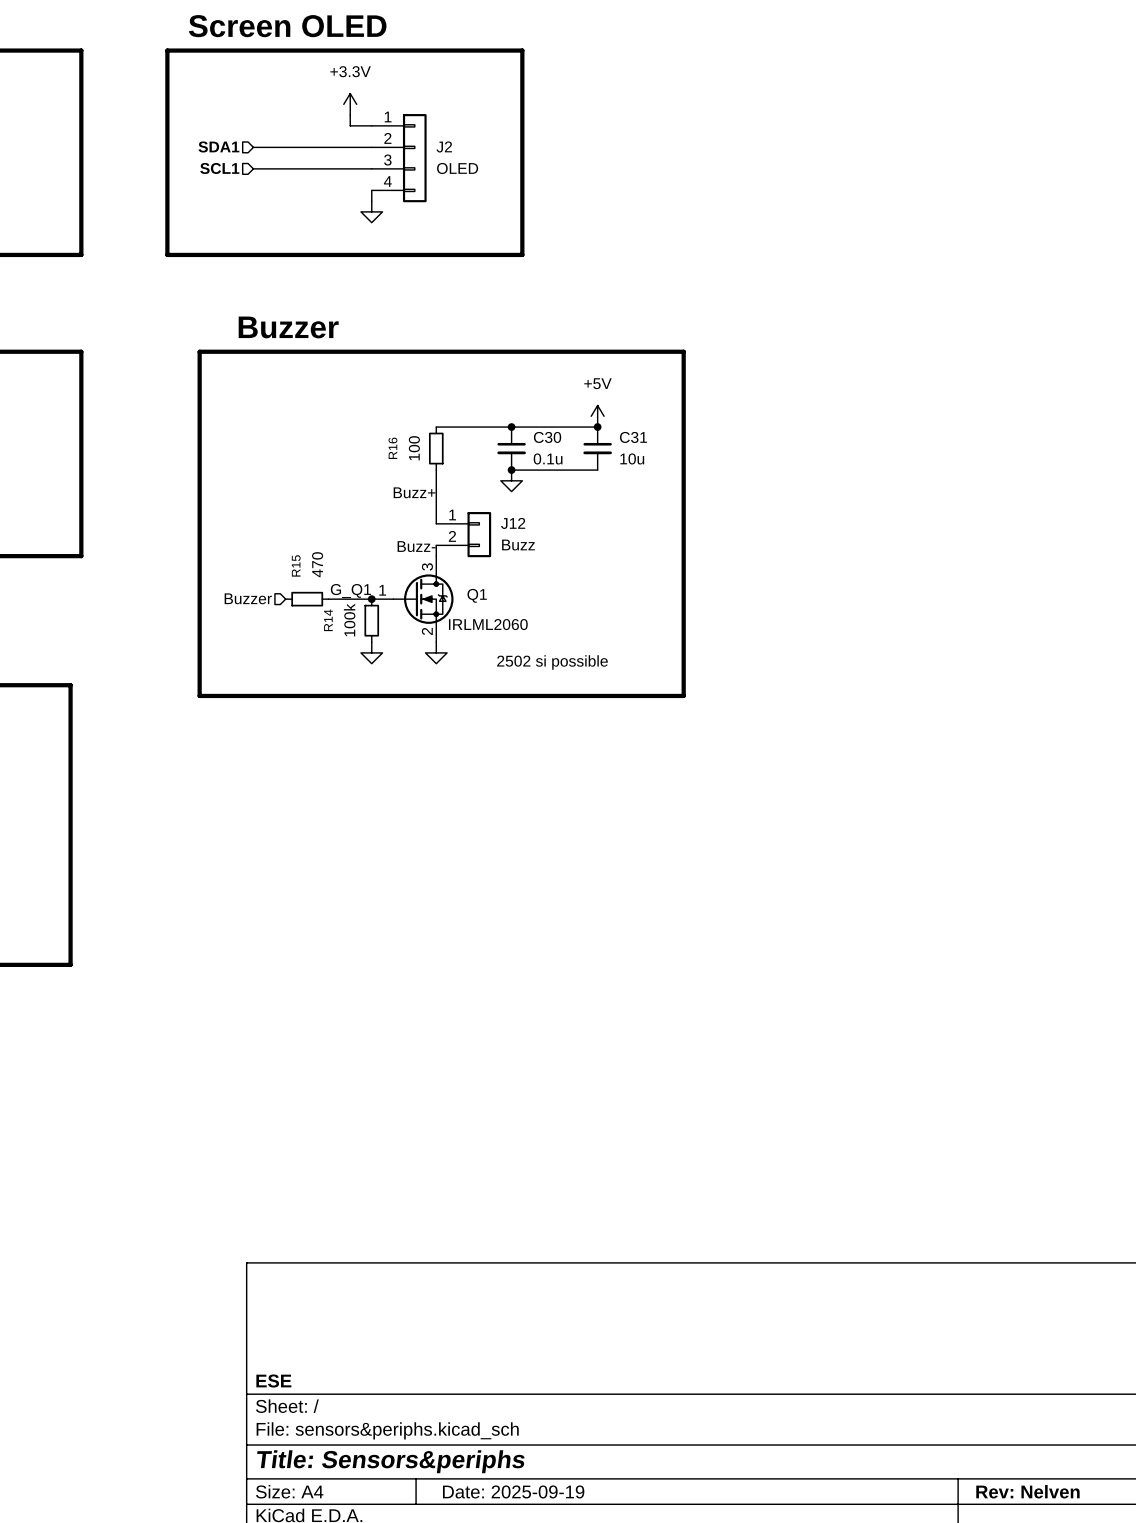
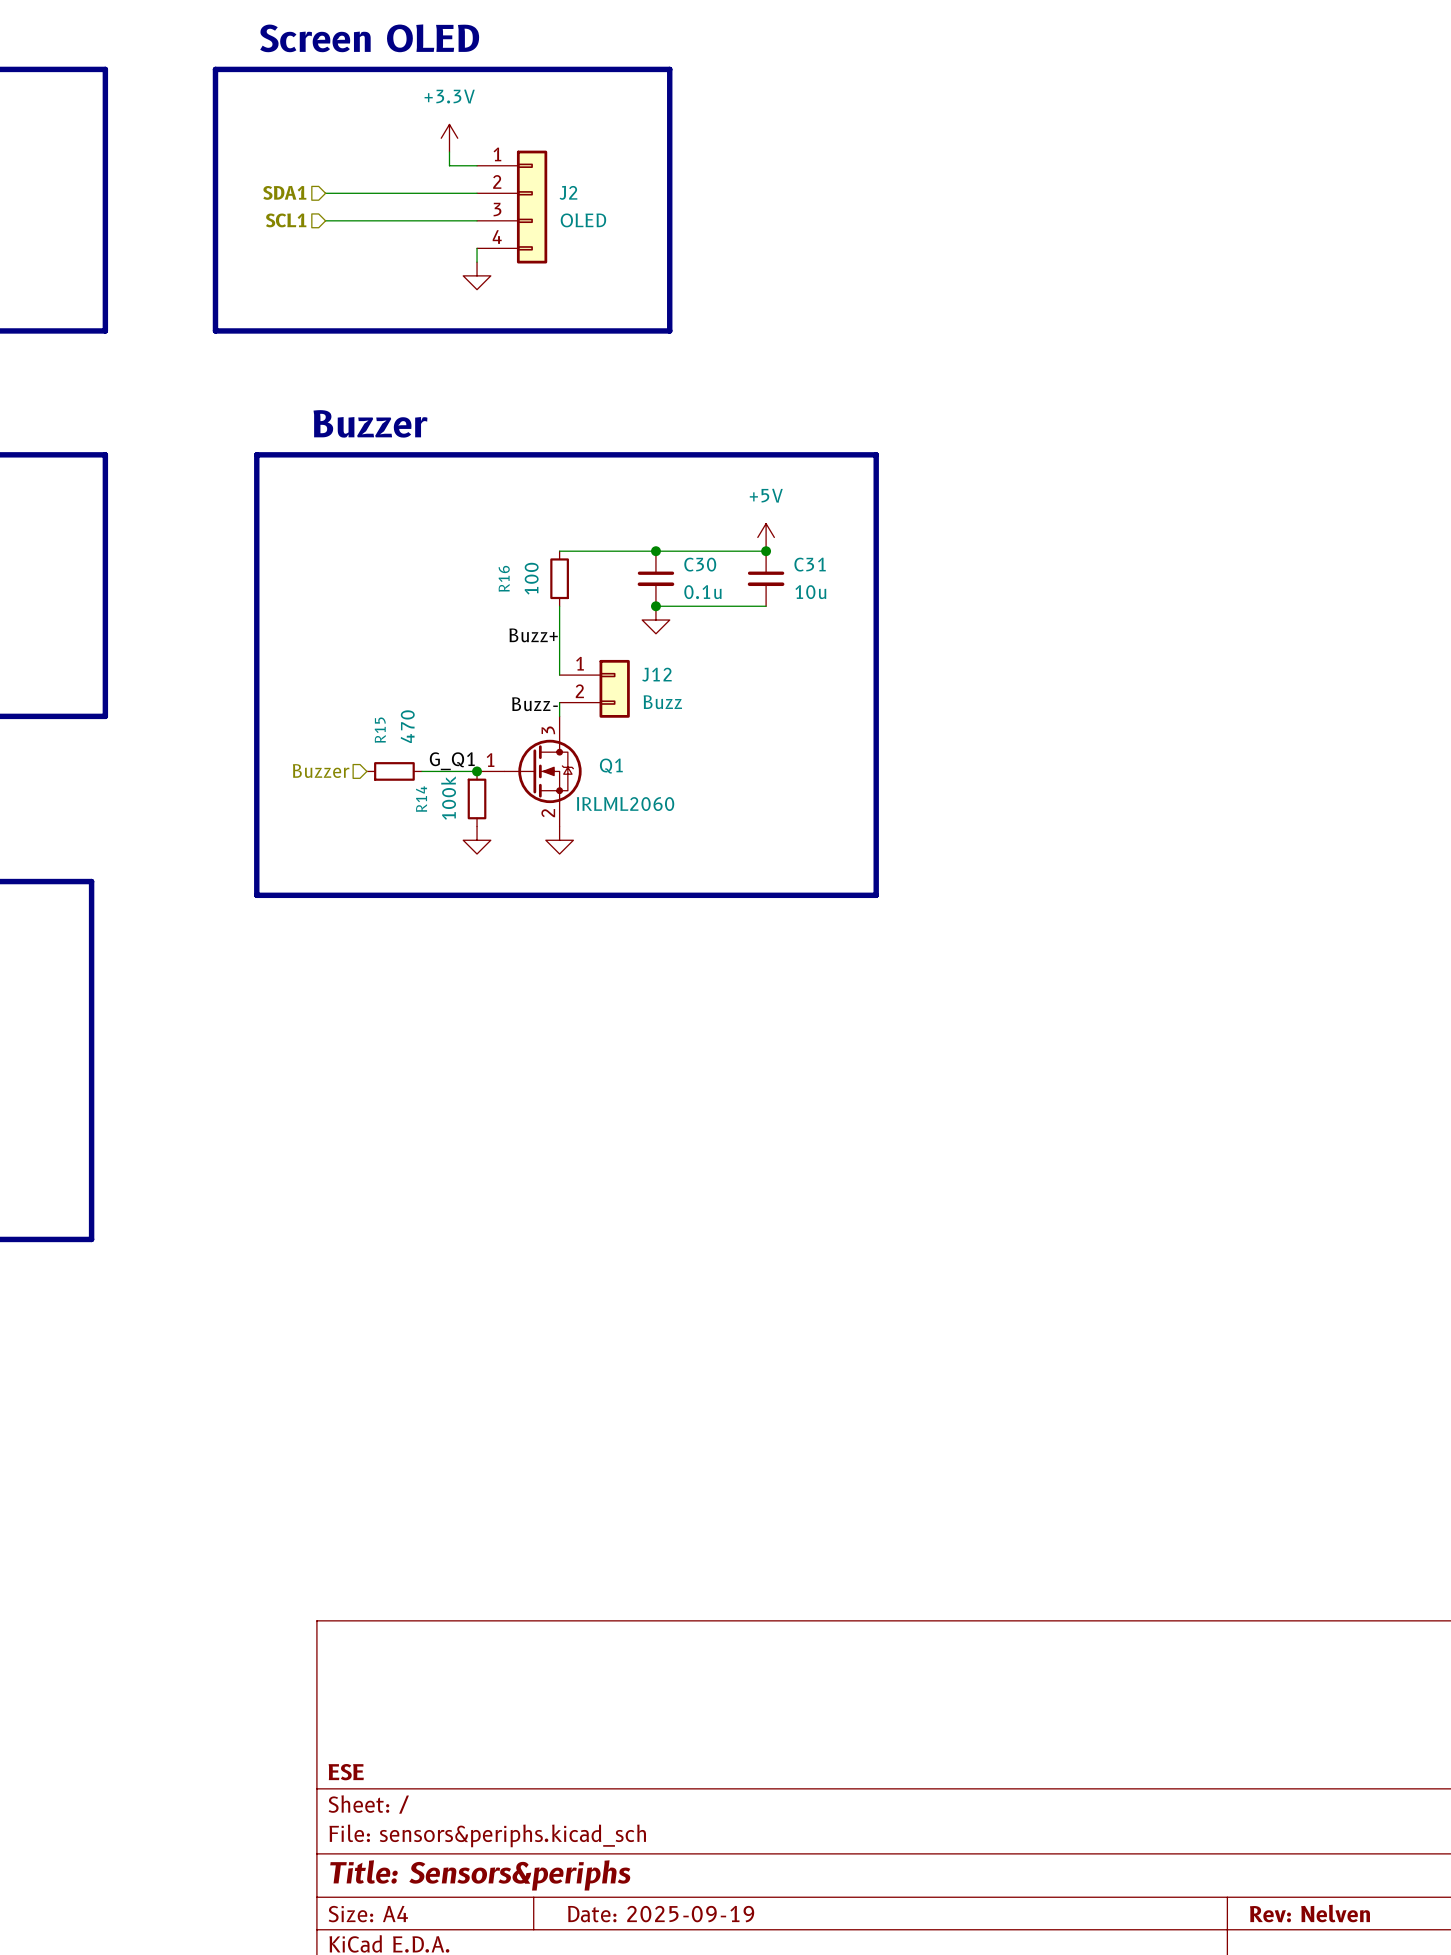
text: 2502 si possible (552, 662) -> none

